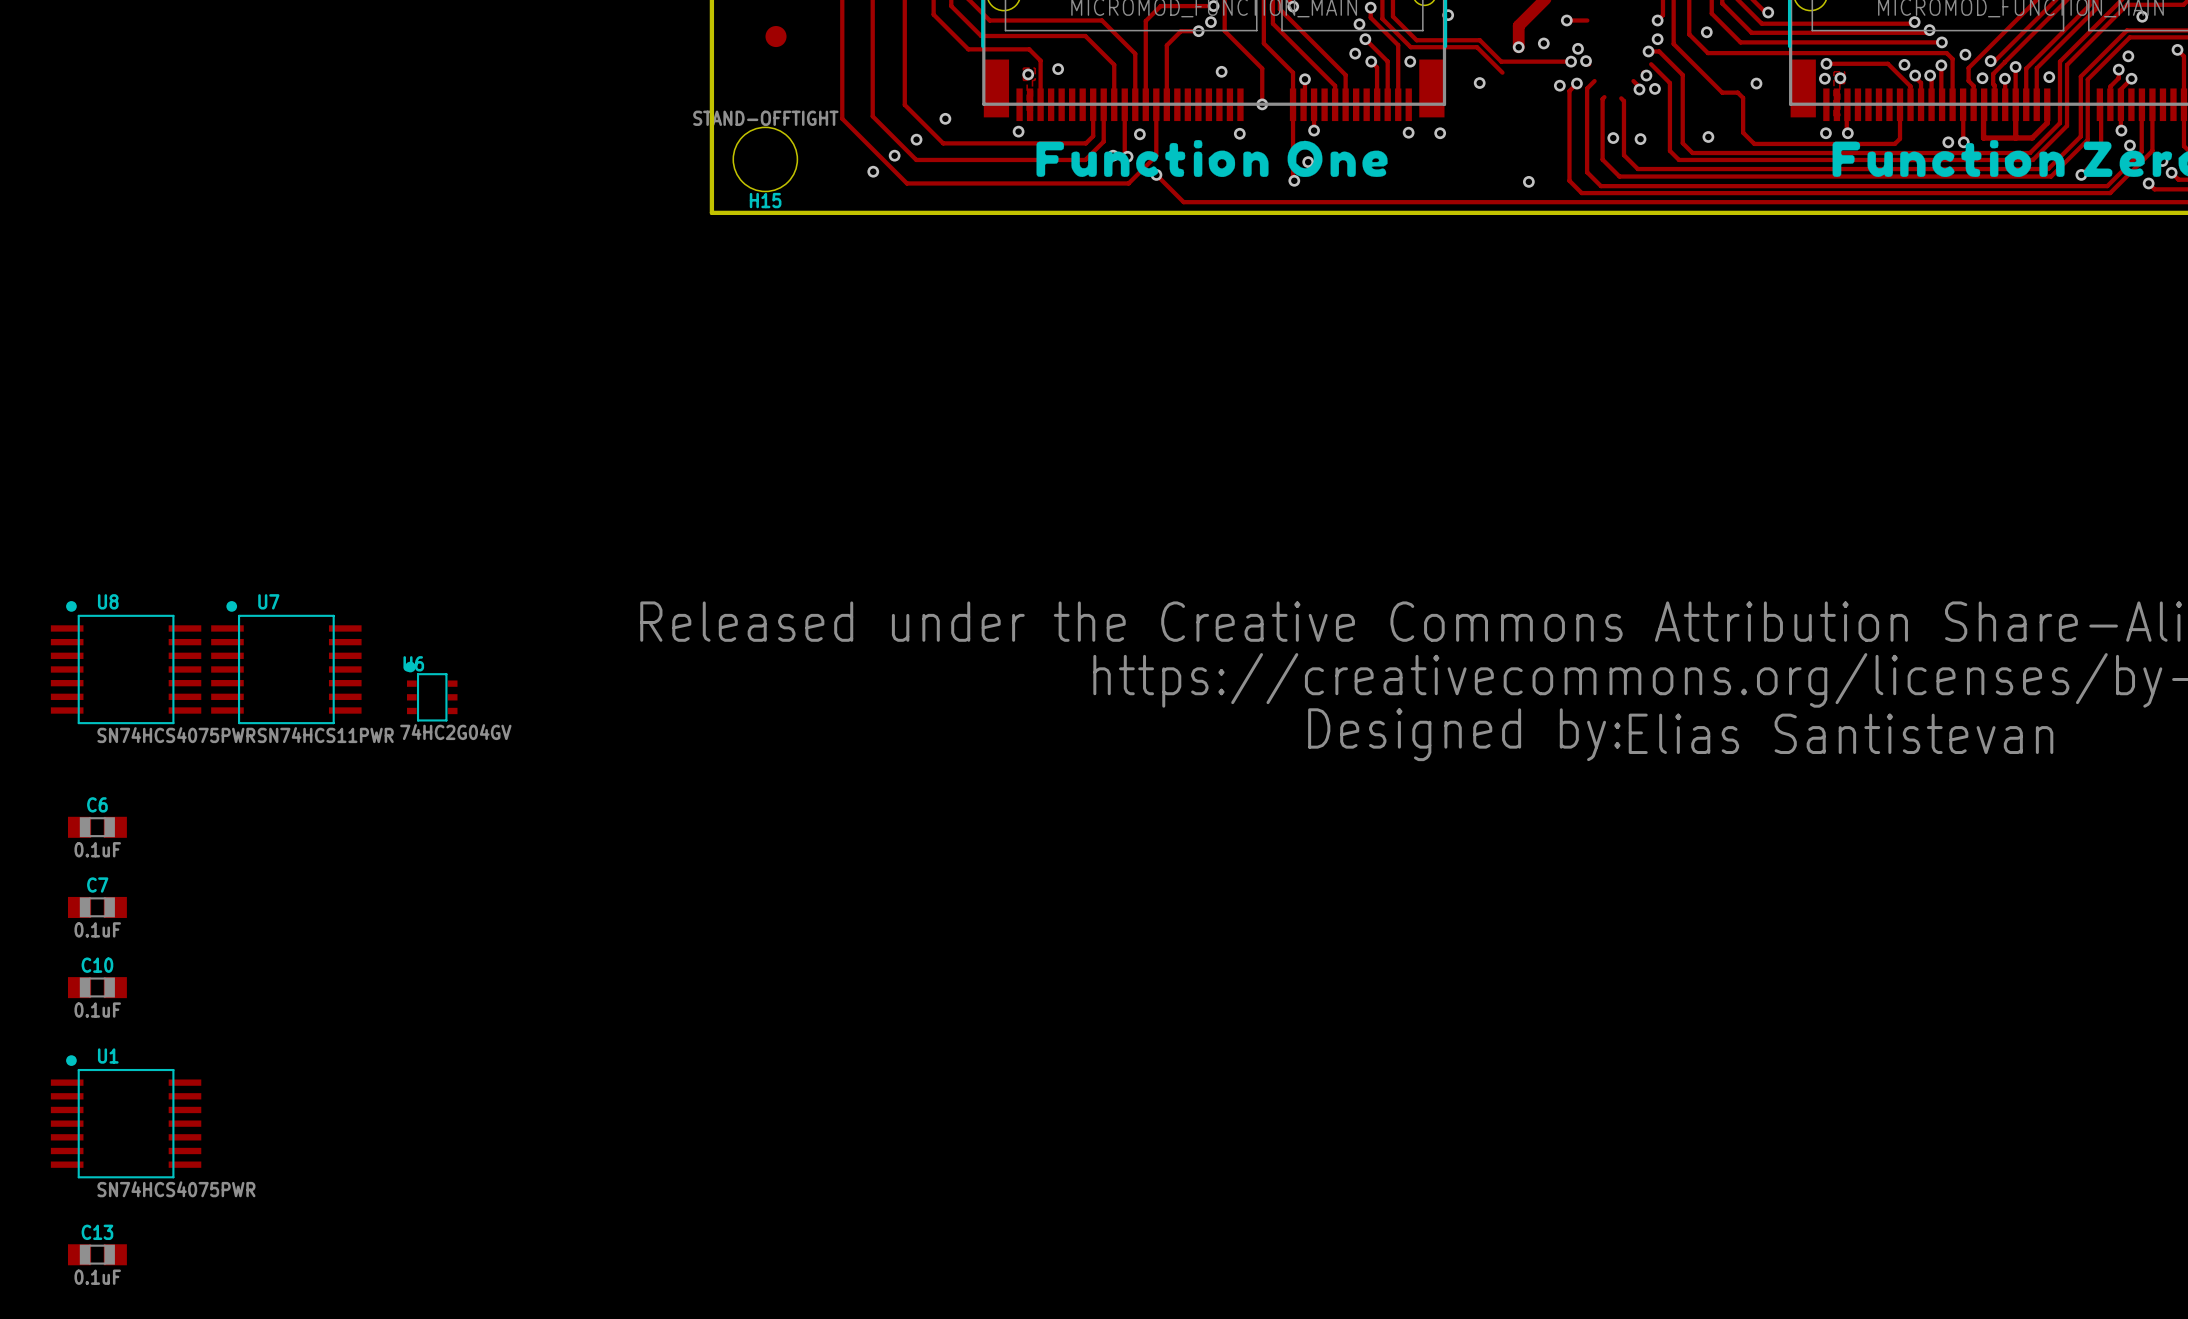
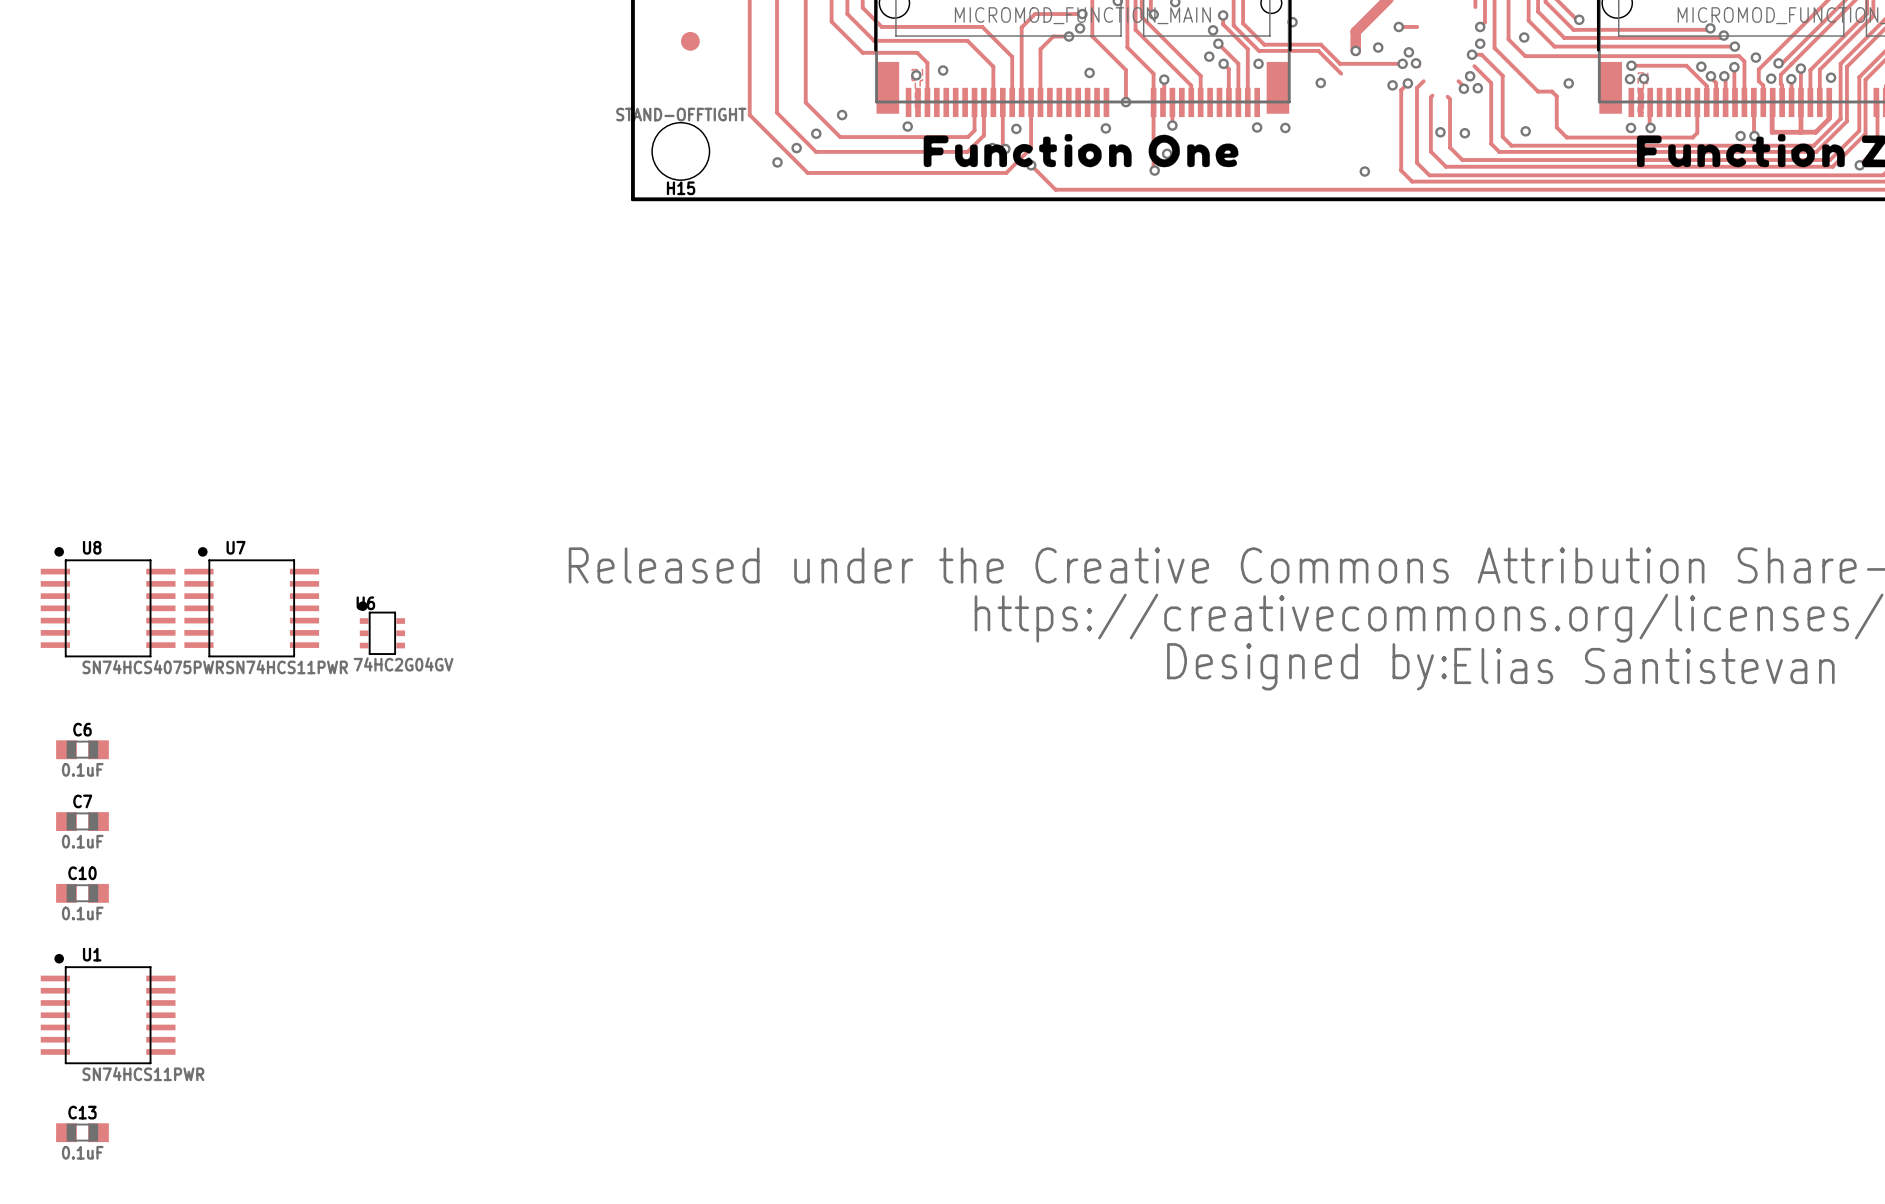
U1 value: SN74HCS4075PWR (176, 1189) -> SN74HCS11PWR (143, 1074)

